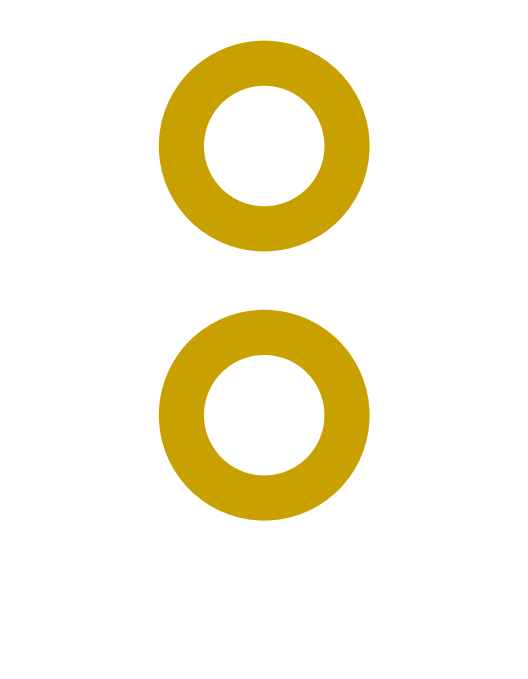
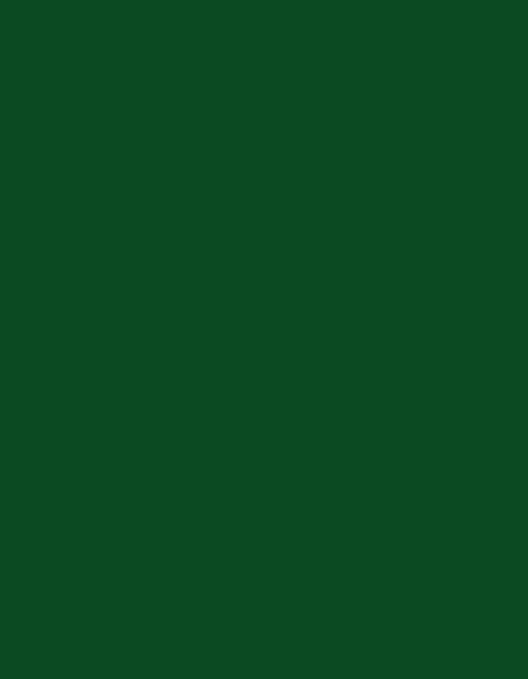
part: (264, 146) -> none
part: (264, 415) -> none

